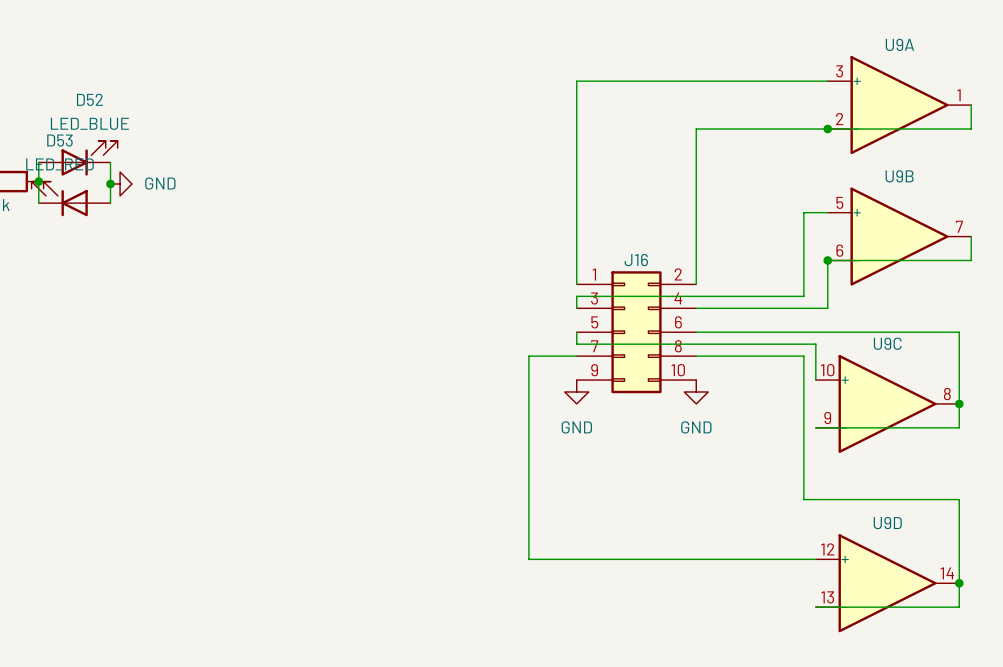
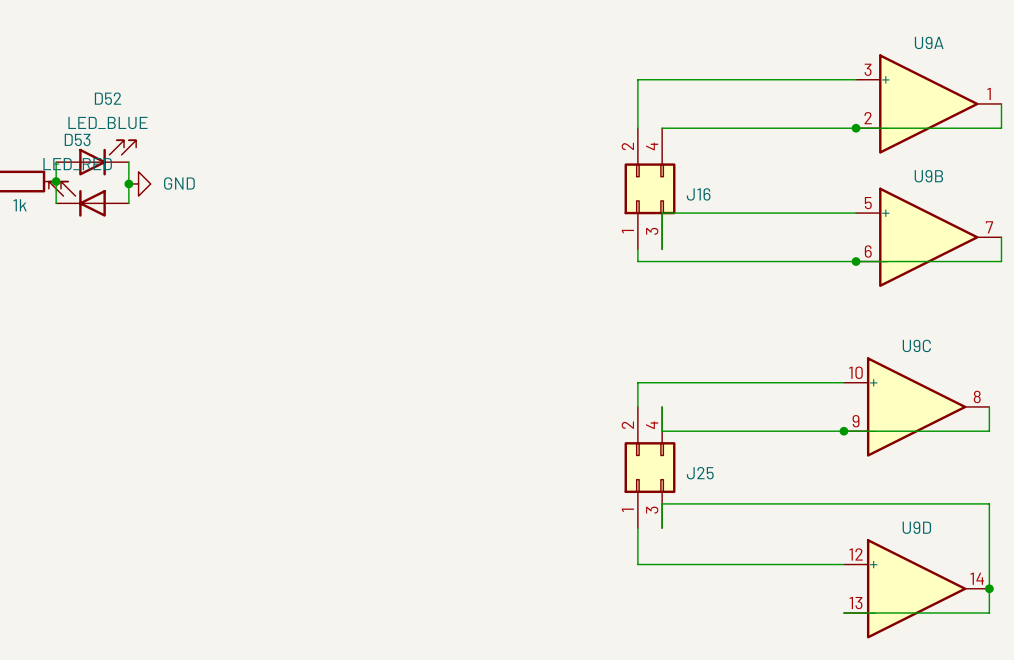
wire: (612, 81) (576, 81) (576, 284) -> (637, 79) (637, 128)
wire: (696, 128) (696, 284) -> (722, 128) (662, 128)
wire: (803, 212) (803, 296) (576, 296) (576, 308) -> (831, 213) (662, 213) (662, 249)
J16 name position: J16 (636, 260) -> J16 (698, 194)
wire: (827, 260) (827, 308) (696, 308) -> (856, 261) (637, 261) (637, 249)
J16 symbol: [576, 271, 697, 394] -> [624, 128, 676, 250]
wire: (576, 332) (576, 344) (815, 344) (815, 380) -> (637, 406) (637, 382) (843, 382)
wire: (696, 332) (959, 332) (959, 403) -> none
wire: (576, 356) (528, 356) (528, 559) (612, 559) -> (637, 528) (637, 564)
wire: (696, 356) (803, 356) (803, 499) -> (662, 528) (662, 503) (831, 503)
power symbol: GND (576, 391) -> none
power symbol: GND (696, 391) -> none
wire: none -> (662, 406) (662, 431) (843, 431)
junction: (959, 403) -> none
junction: none -> (843, 431)
J25: none -> (650, 467)

